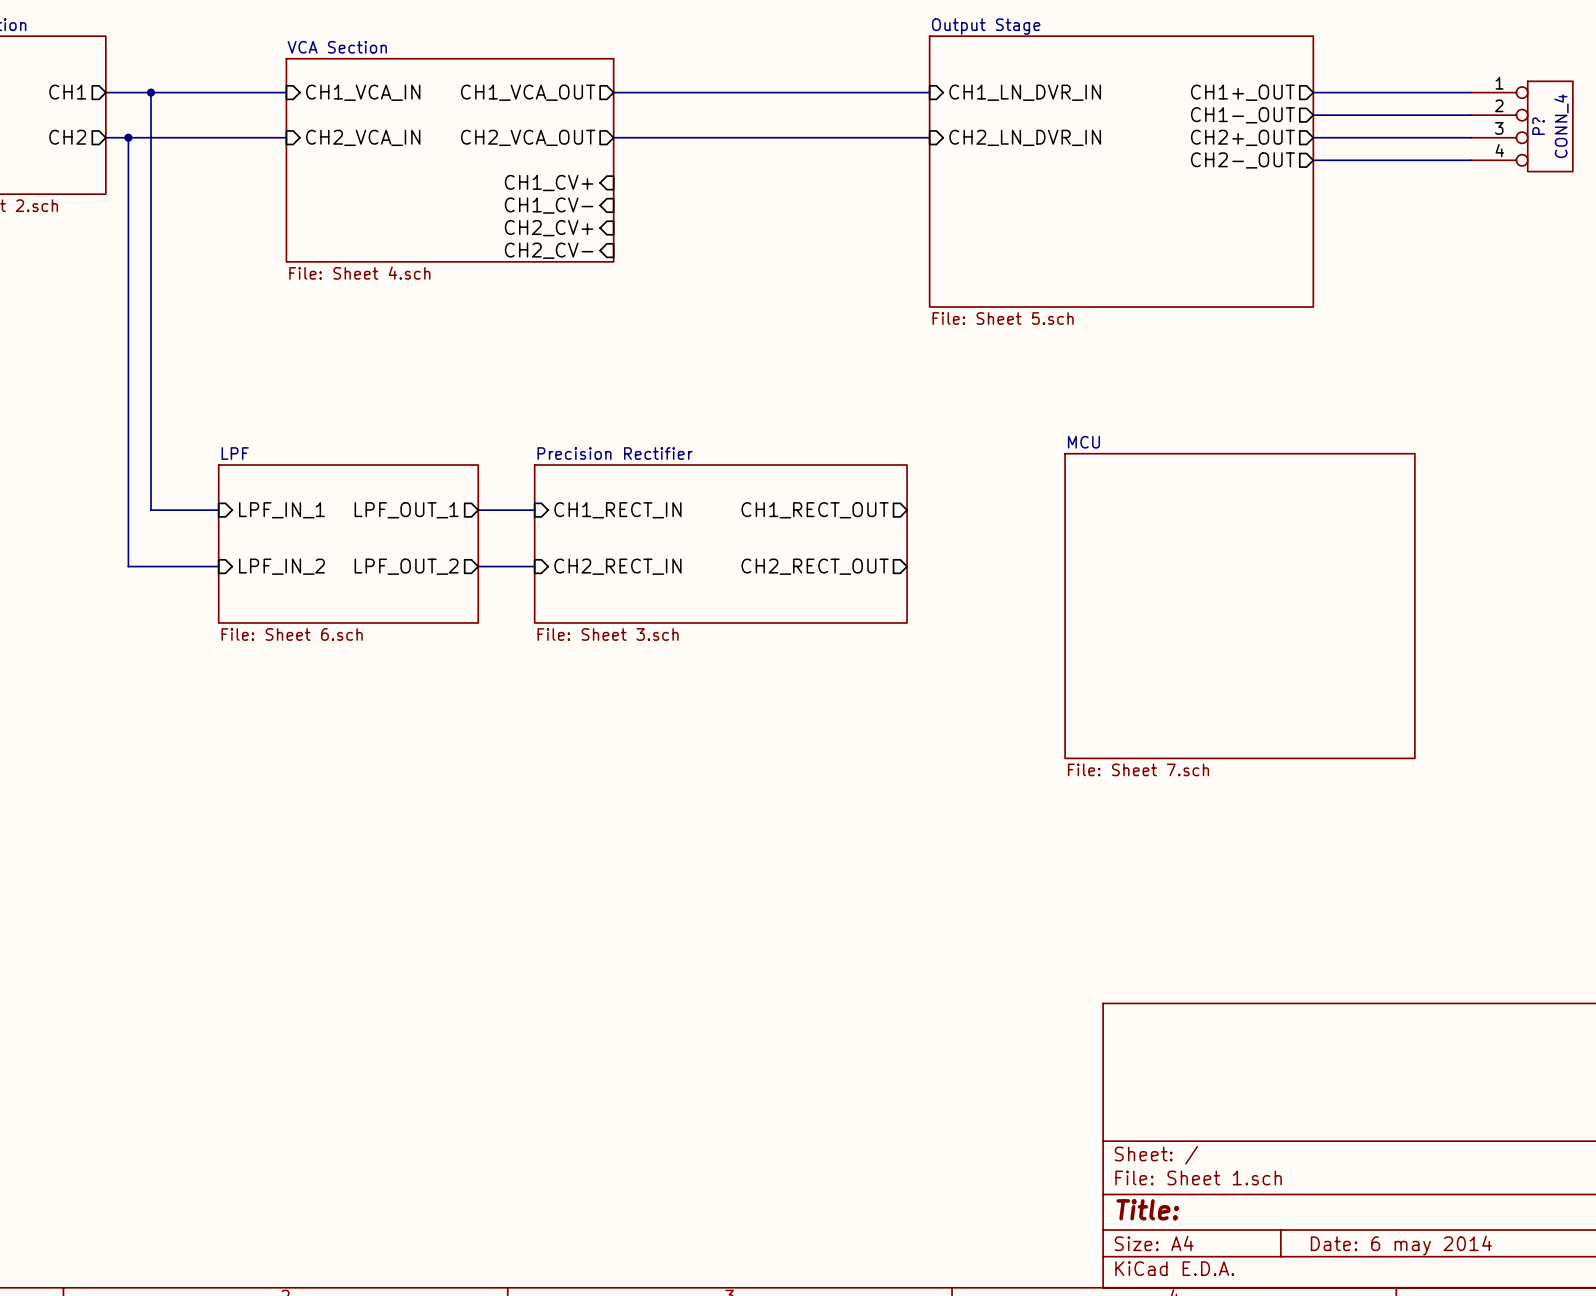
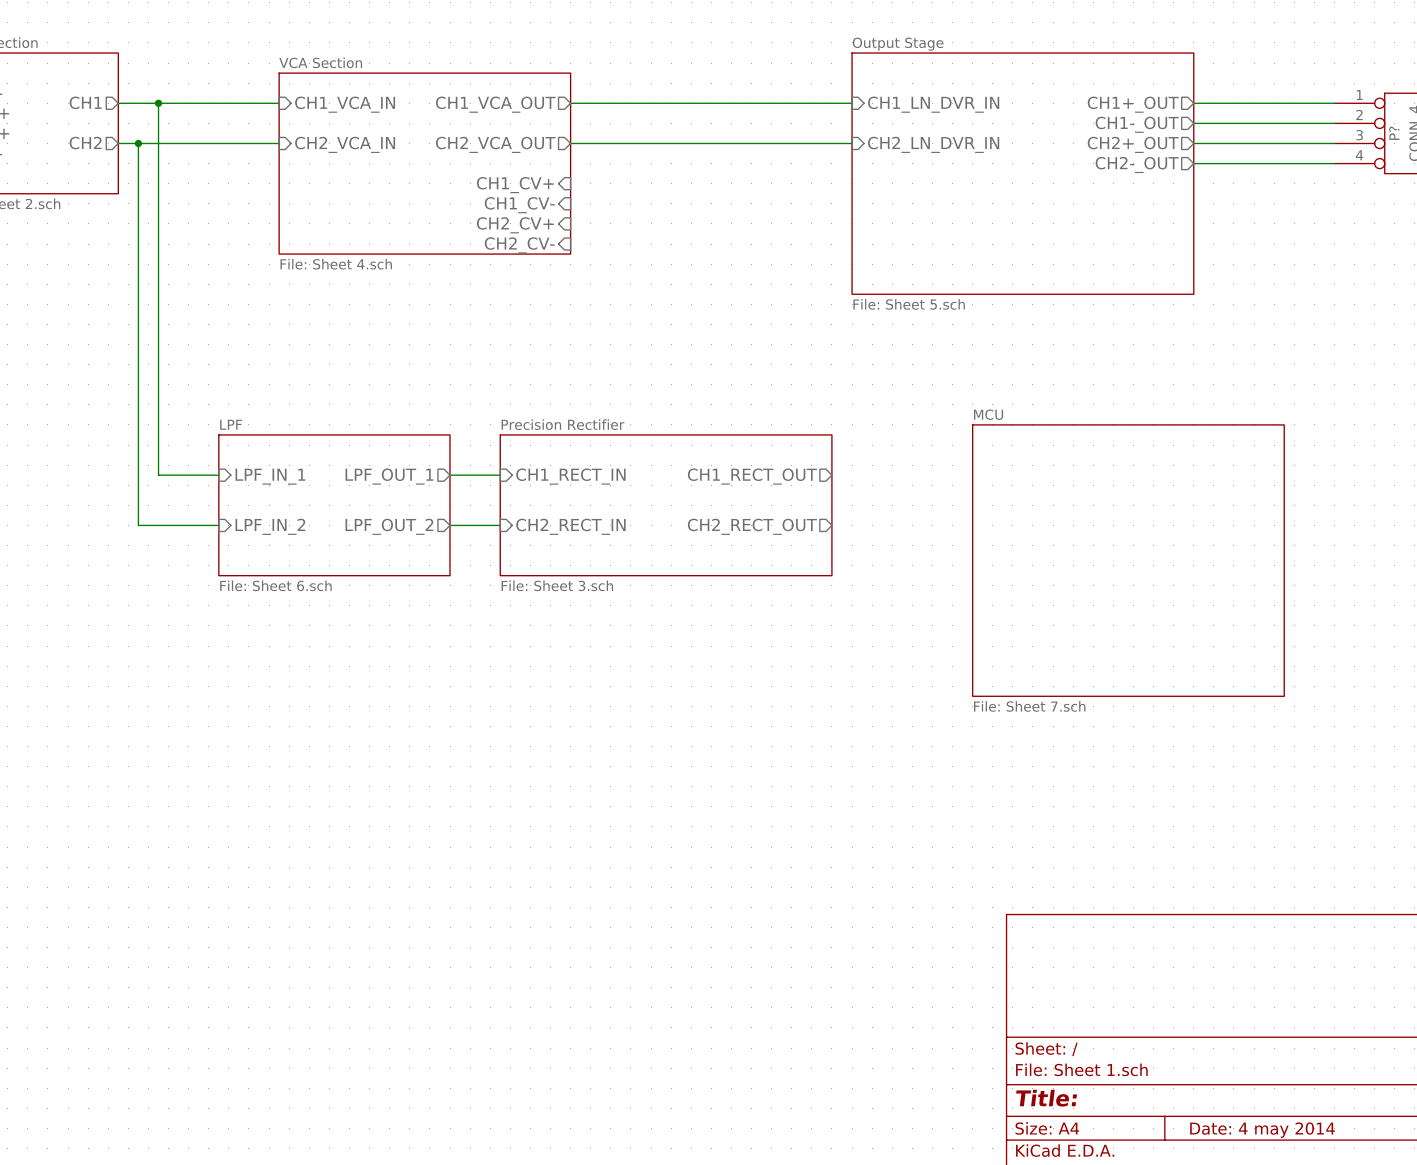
title block: Date: 6 may 2014 (1401, 1245) -> Date: 4 may 2014 (1262, 1130)

